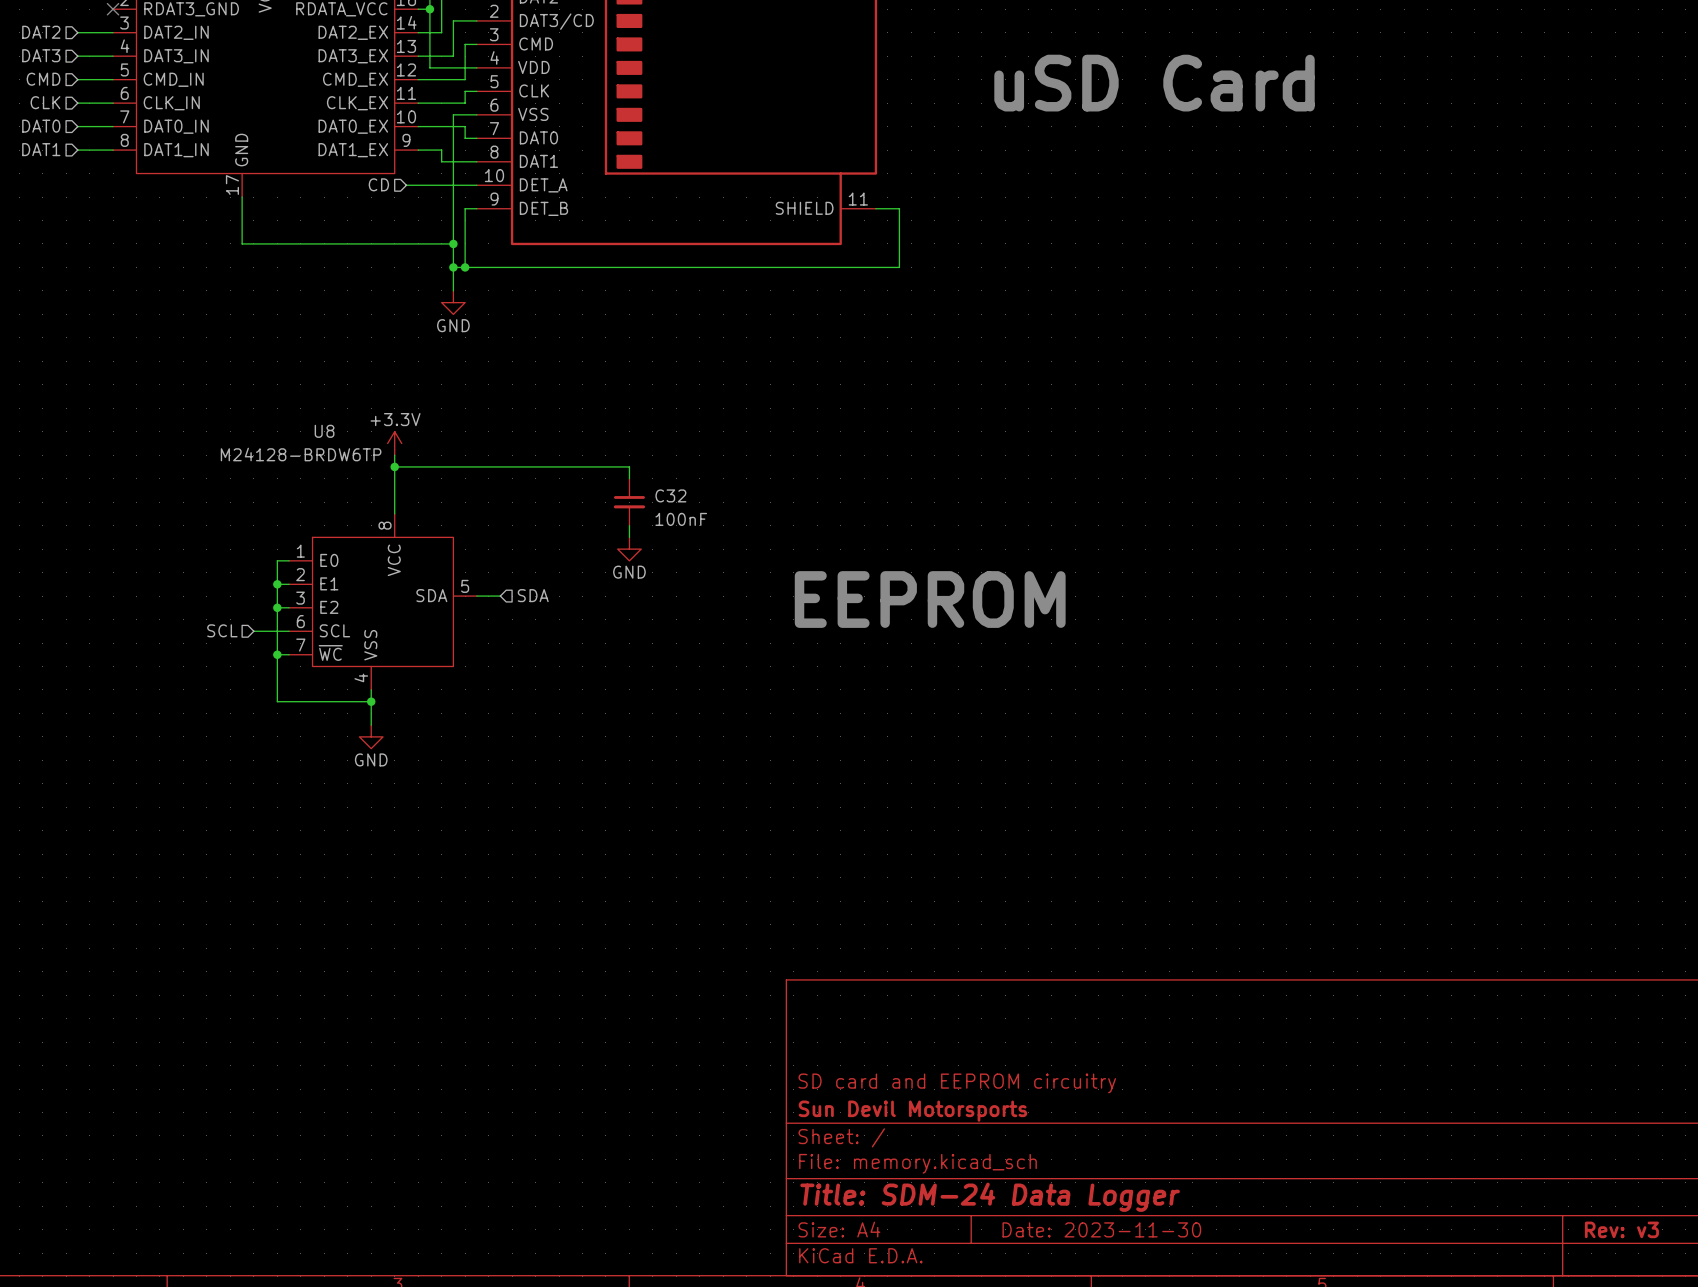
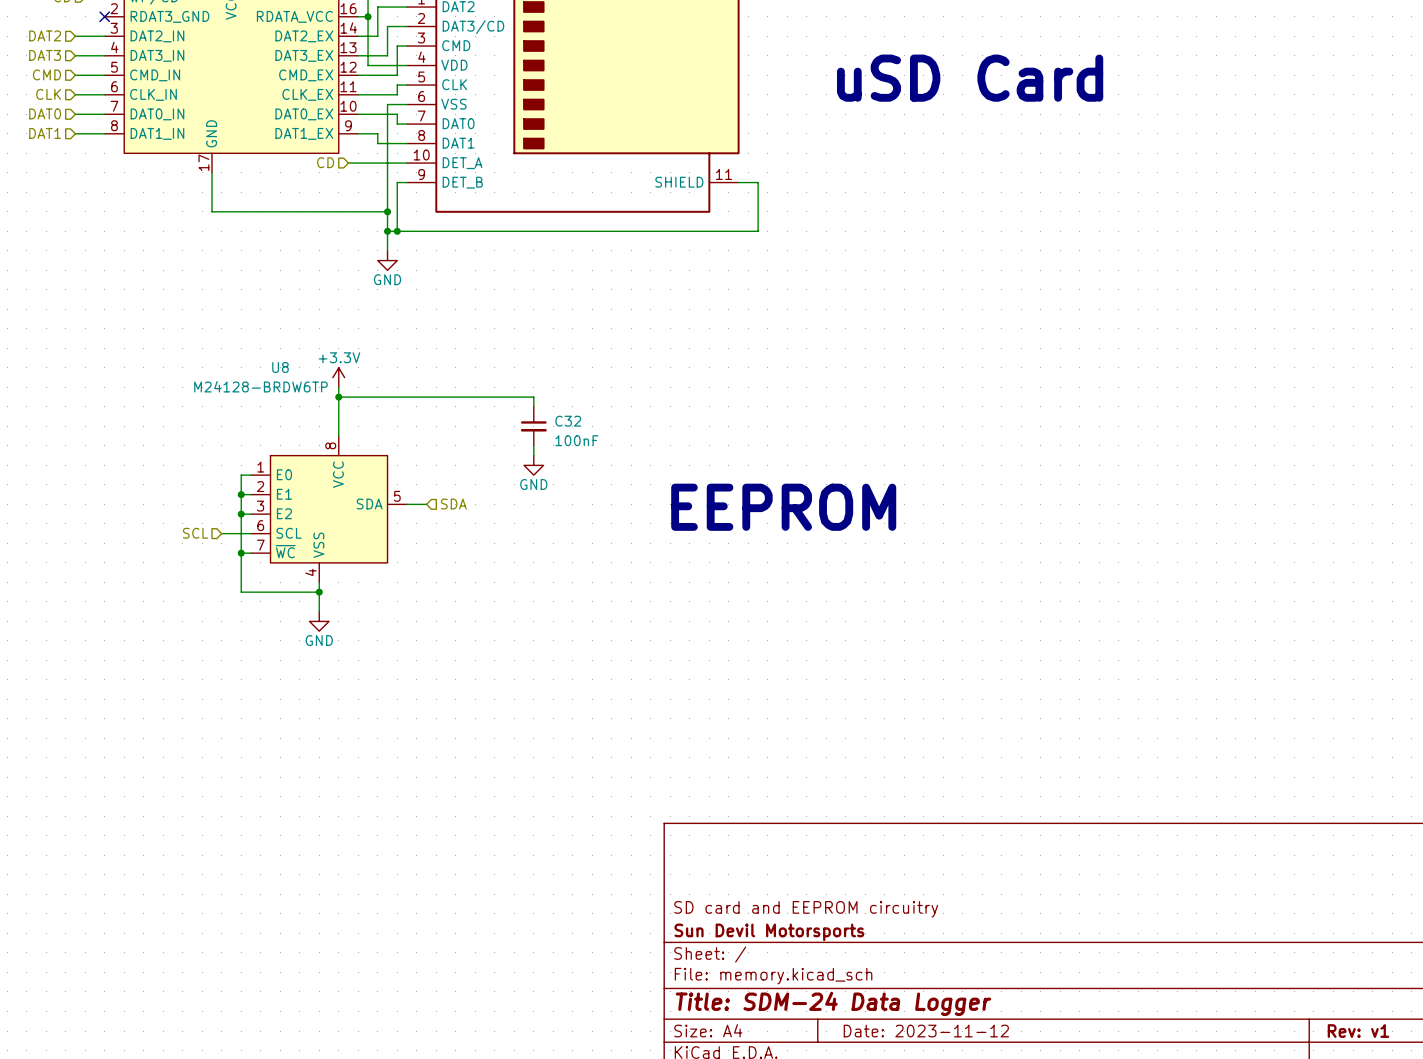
title block: Date: 2023-11-30 (1101, 1229) -> Date: 2023-11-12 (926, 1031)
title block: Rev: v3 (1621, 1229) -> Rev: v1 (1358, 1031)

